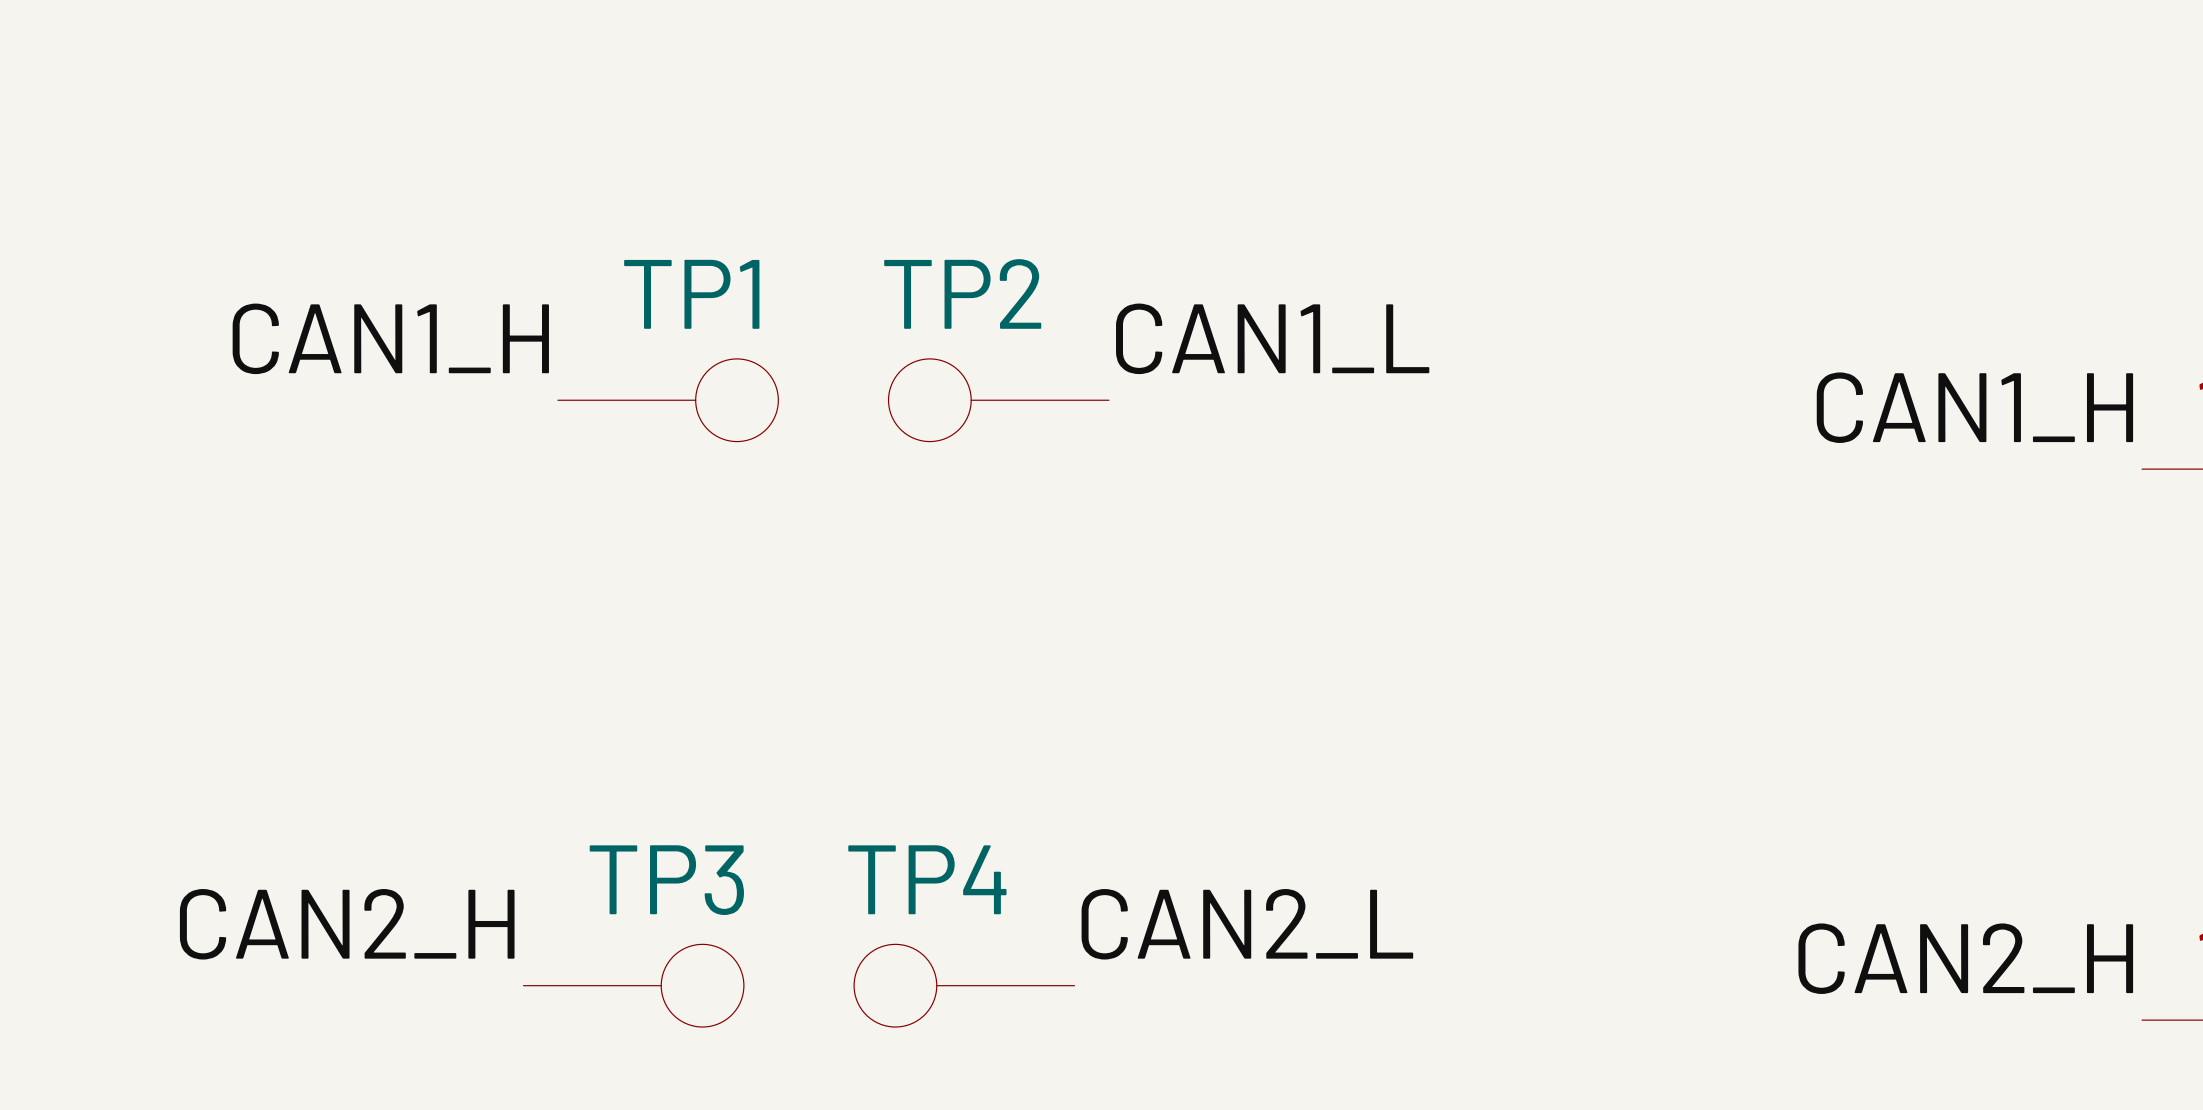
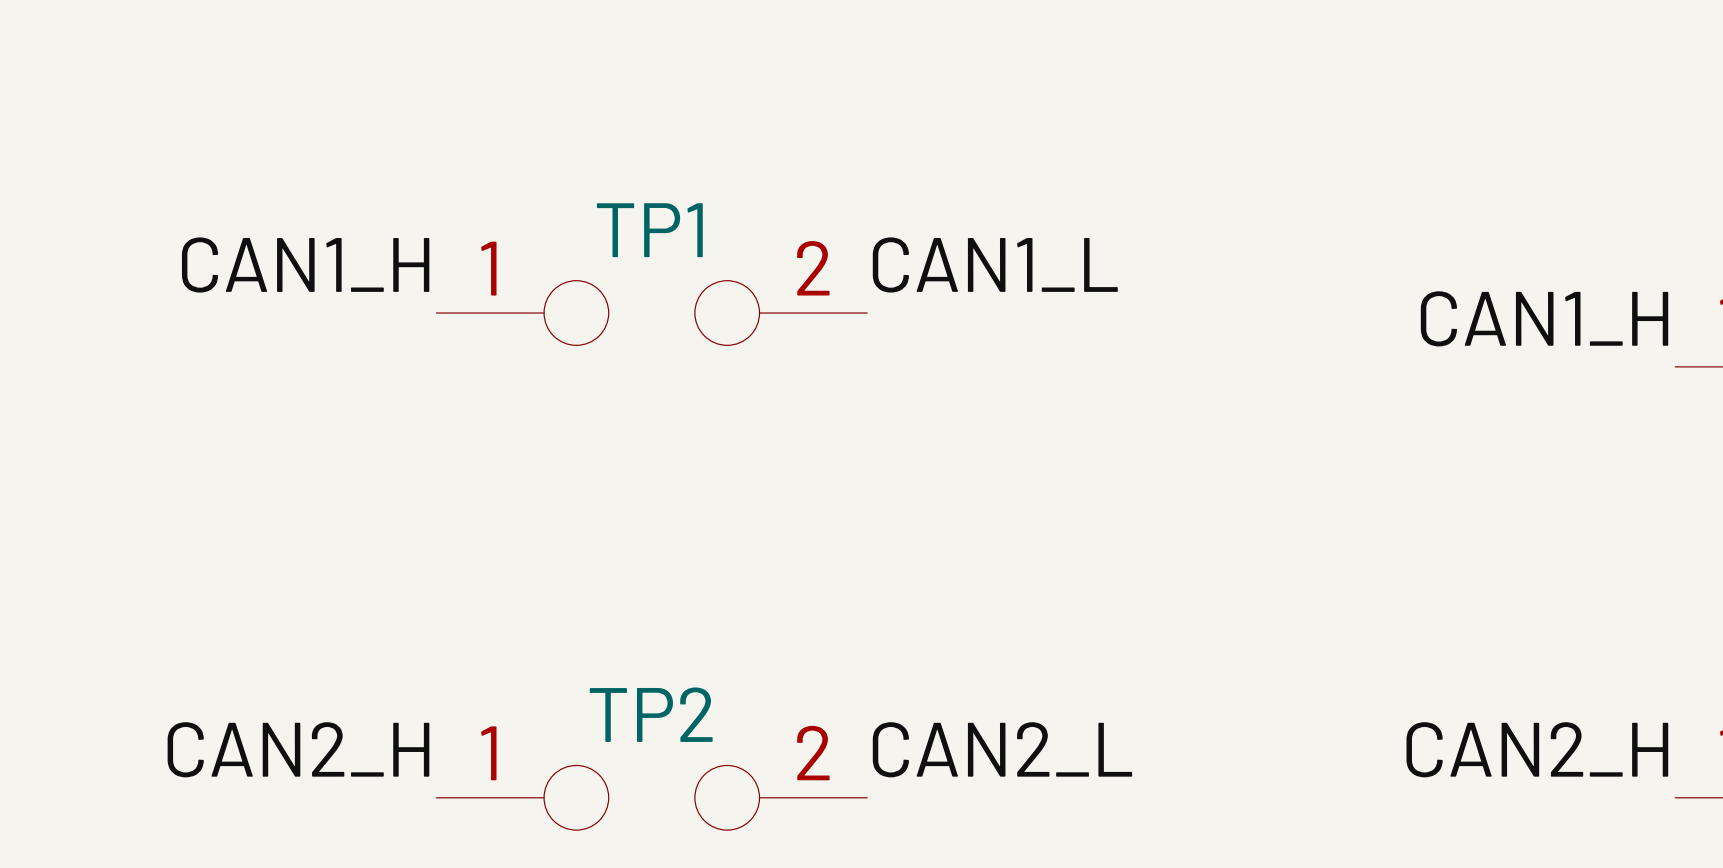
TP1 symbol: [557, 358, 779, 442] -> [436, 280, 868, 346]
TP2 symbol: [888, 358, 1109, 442] -> [436, 765, 868, 831]
label position: CAN2_H (347, 924) -> CAN2_H (298, 749)
label position: CAN2_L (1247, 924) -> CAN2_L (1002, 749)
TP3: (633, 985) -> none
TP4: (964, 985) -> none

